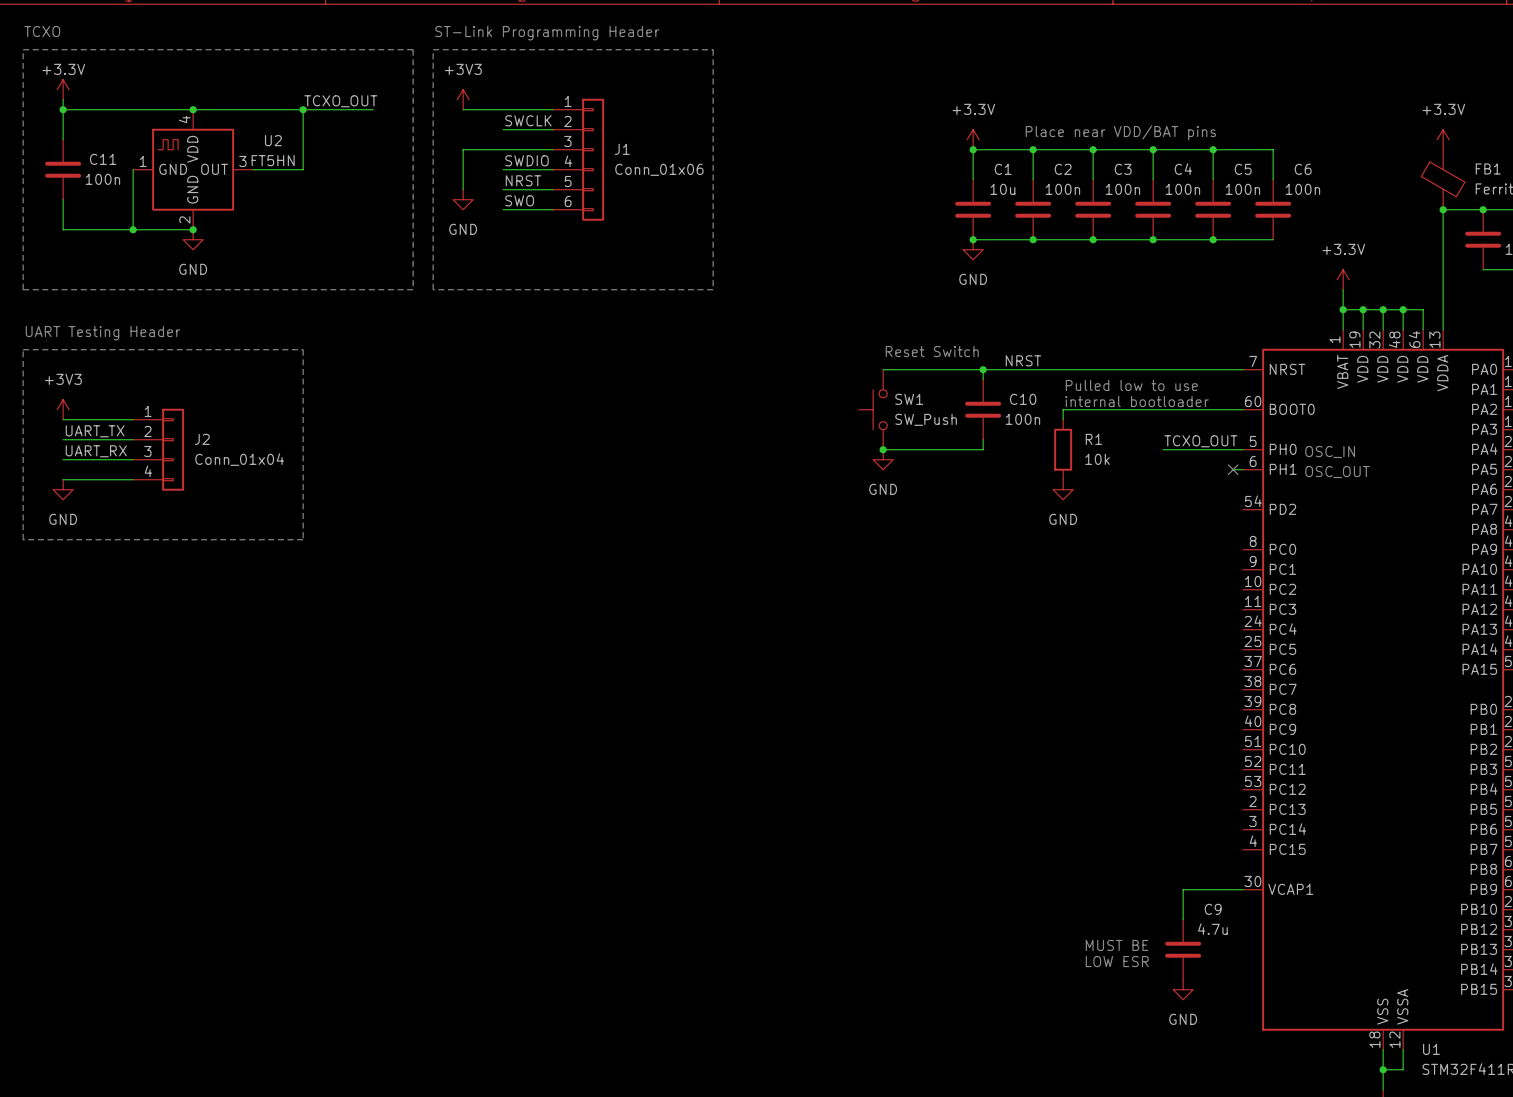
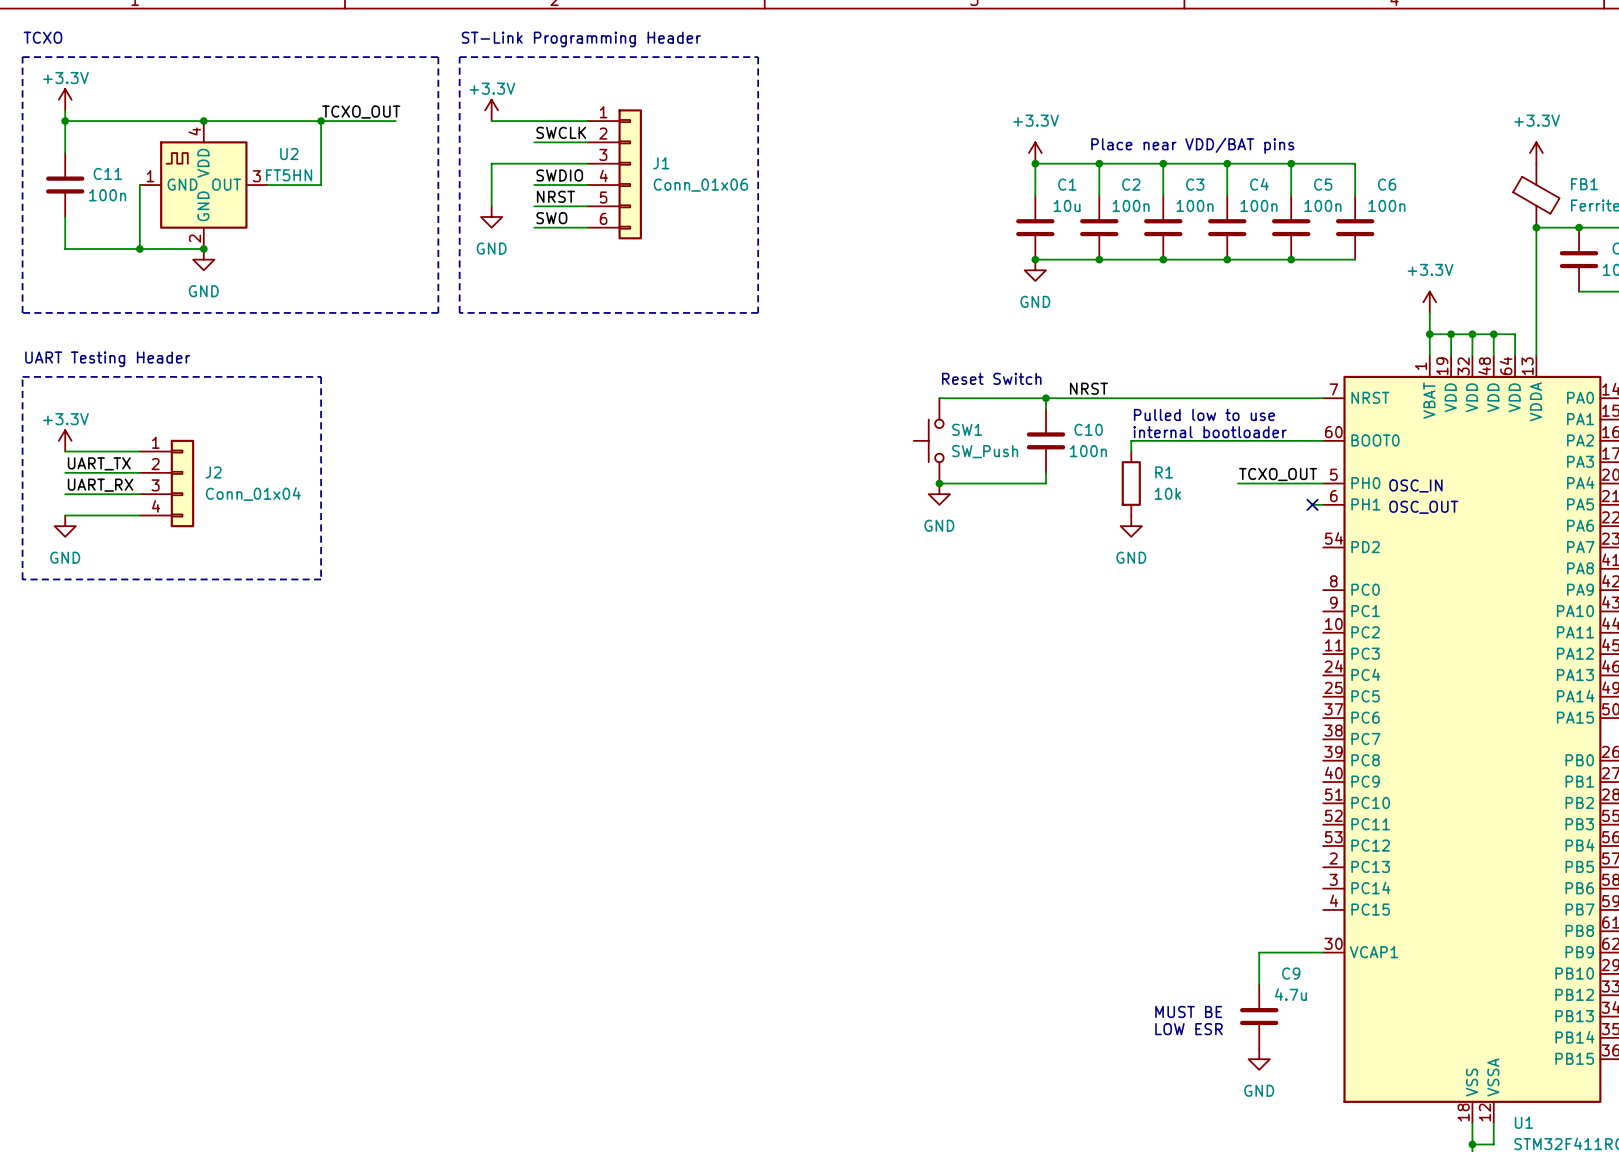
power symbol: +3V3 (463, 99) -> +3.3V (491, 110)
power symbol: +3V3 (63, 409) -> +3.3V (65, 440)

